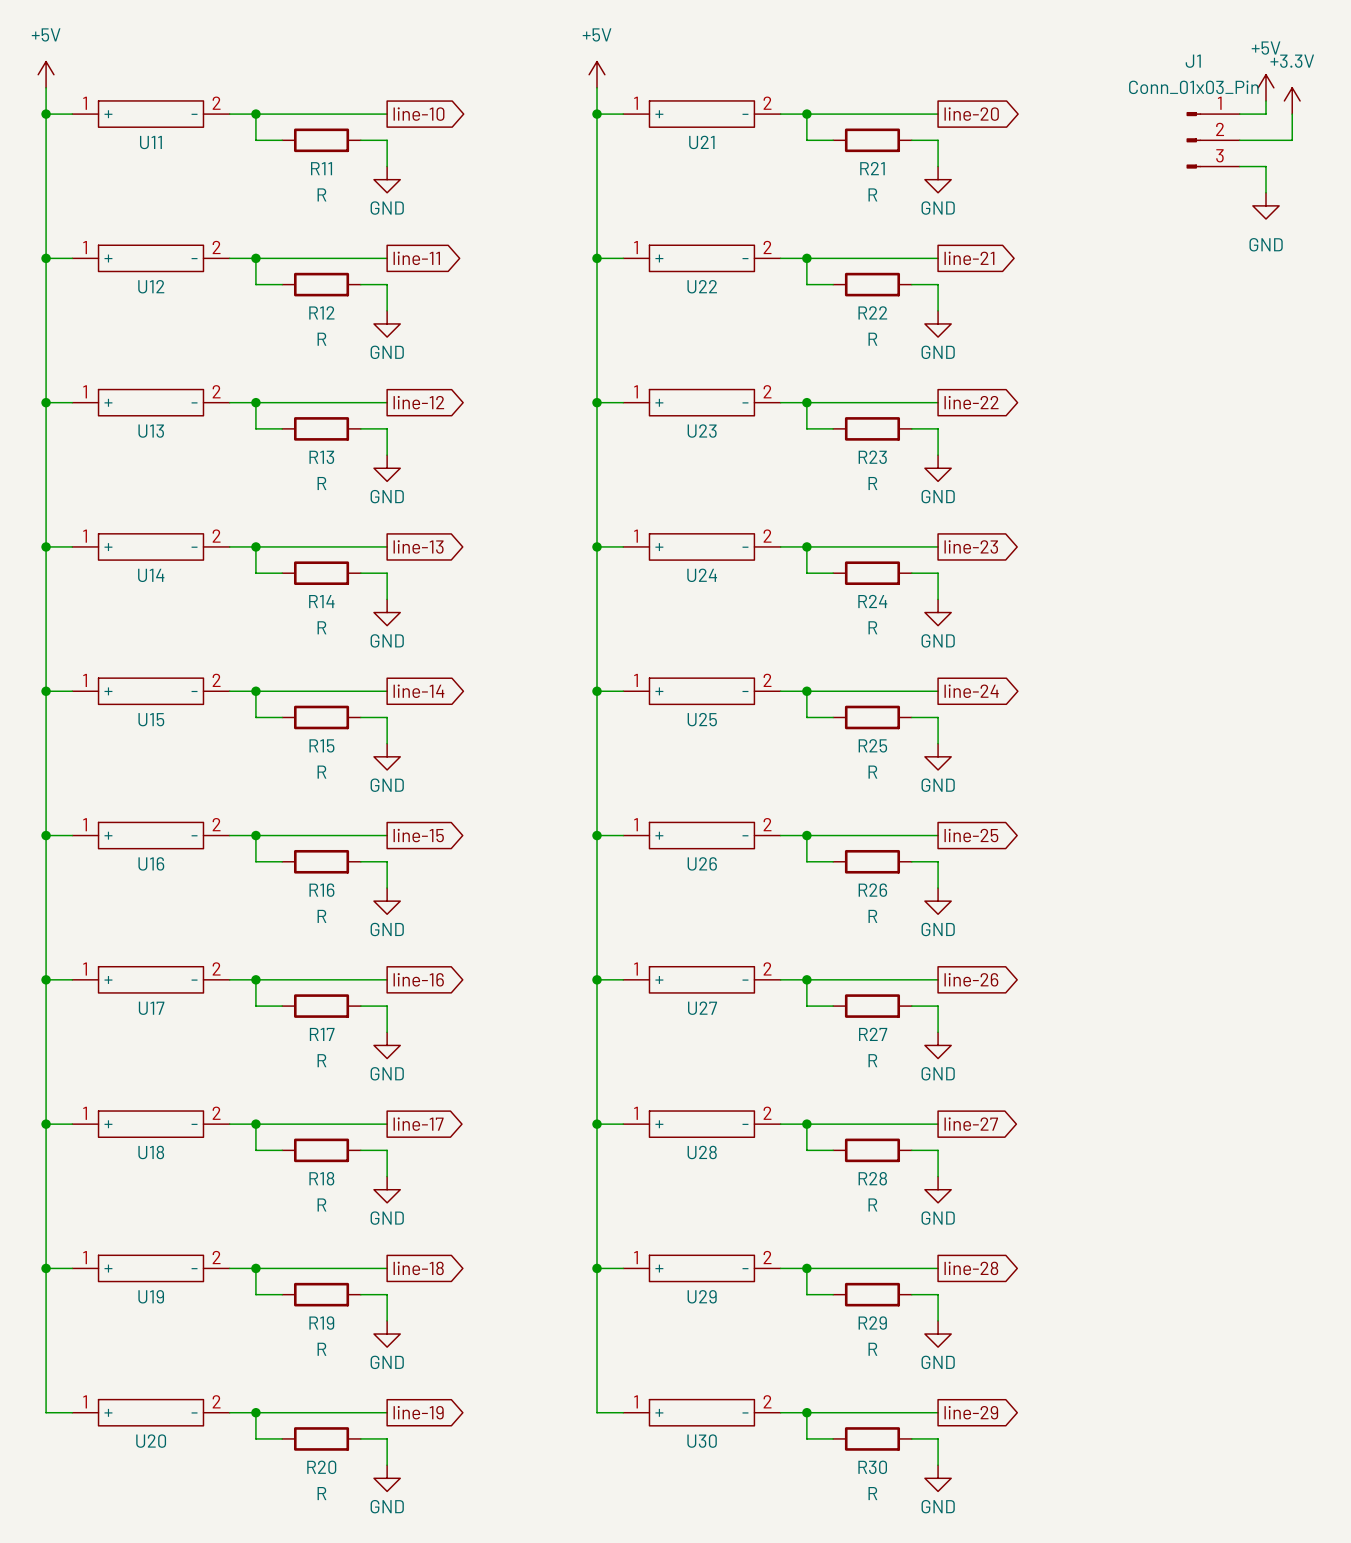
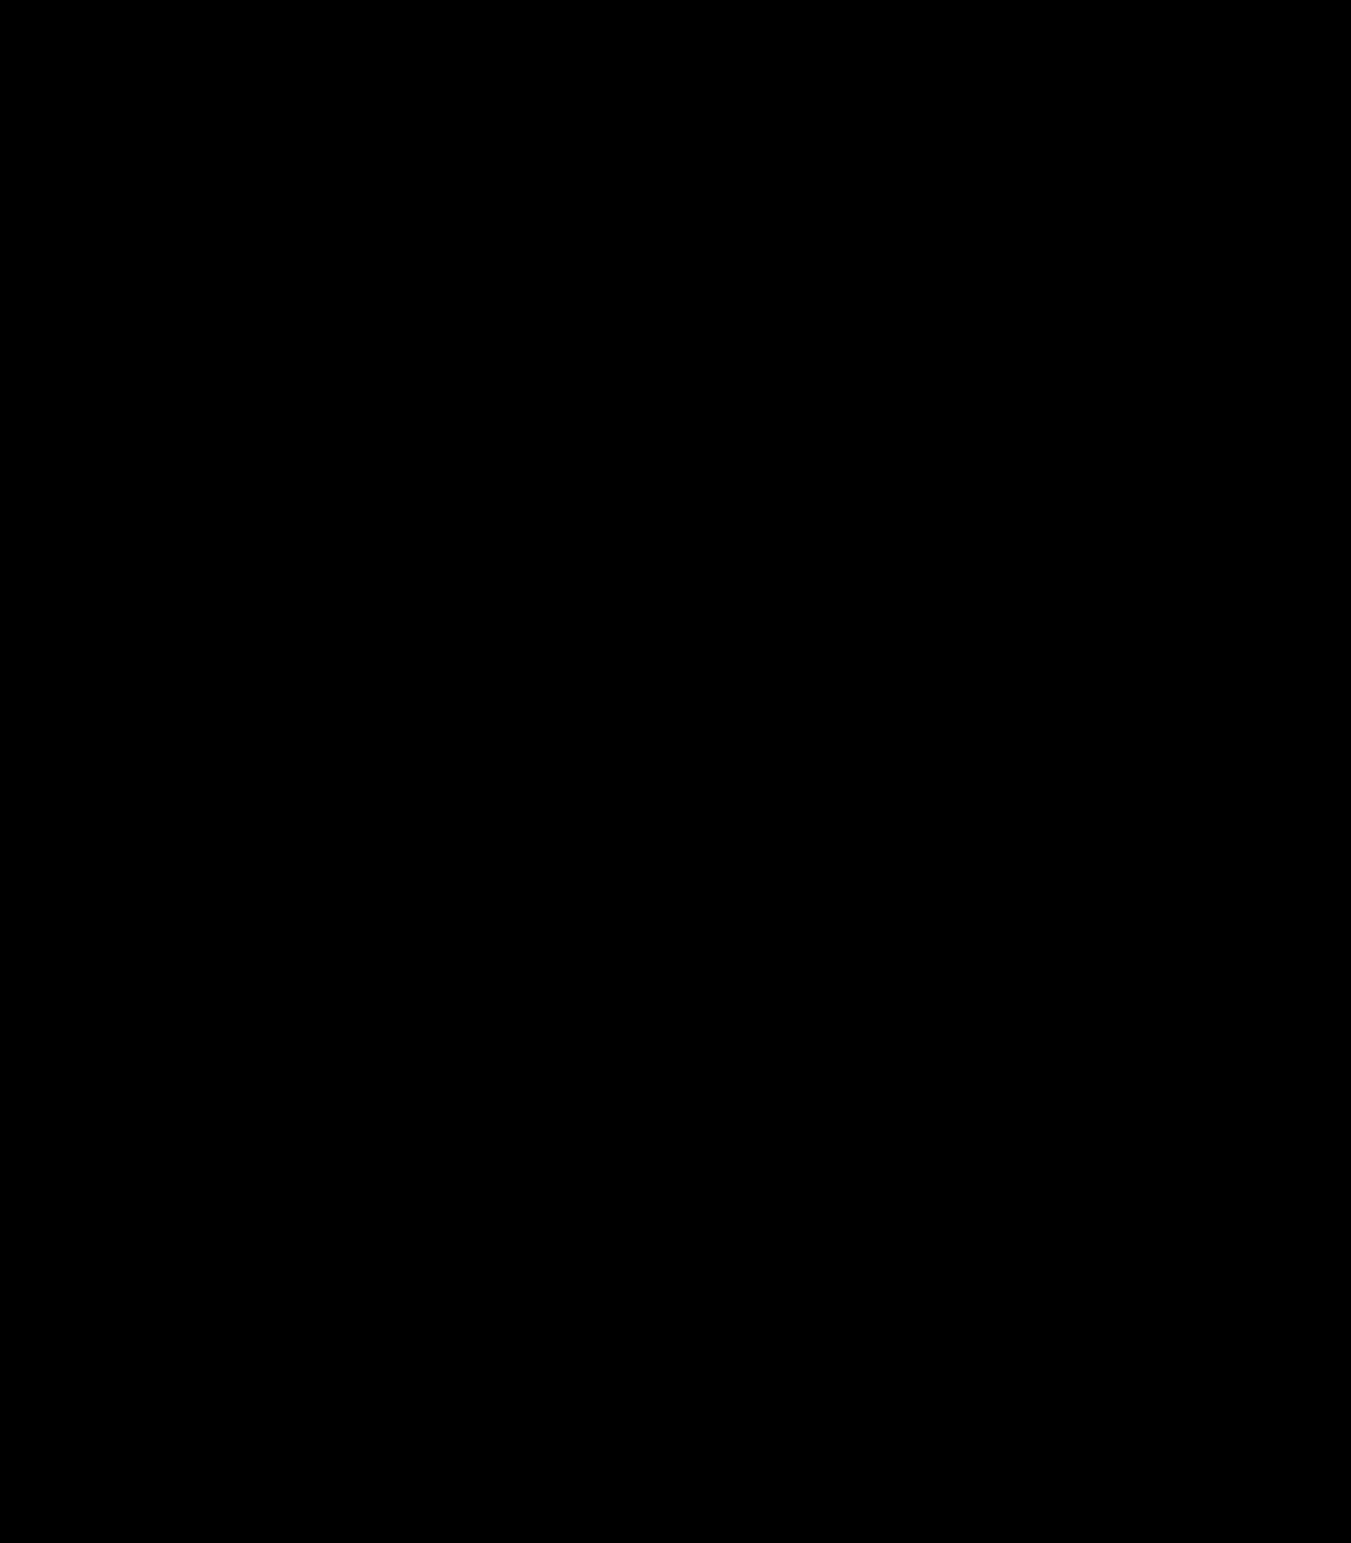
power symbol: +5V (46, 74) -> none
power symbol: +5V (597, 74) -> none
wire: (46, 87) (46, 1412) (72, 1412) -> none
wire: (597, 87) (597, 1412) (623, 1412) -> none
power symbol: +5V (1266, 87) -> none
wire: (1266, 100) (1266, 114) (1239, 114) -> none
power symbol: +3.3V (1292, 100) -> none
wire: (46, 114) (72, 114) -> none
junction: (46, 114) -> none
U11: (151, 114) -> none
wire: (229, 114) (387, 114) -> none
wire: (255, 114) (255, 140) (282, 140) -> none
junction: (255, 114) -> none
global label: line-10 (418, 114) -> none
wire: (597, 114) (623, 114) -> none
junction: (597, 114) -> none
U21: (701, 114) -> none
wire: (780, 114) (938, 114) -> none
wire: (806, 114) (806, 140) (833, 140) -> none
junction: (806, 114) -> none
global label: line-20 (971, 114) -> none
wire: (1292, 114) (1292, 140) (1239, 140) -> none
R11: R (321, 140) -> none
wire: (360, 140) (387, 140) (387, 166) -> none
R21: R (872, 140) -> none
wire: (911, 140) (938, 140) (938, 166) -> none
J1: Conn_01x03_Pin (1213, 140) -> none
wire: (1239, 166) (1266, 166) (1266, 192) -> none
power symbol: GND (387, 179) -> none
power symbol: GND (938, 179) -> none
power symbol: GND (1266, 205) -> none
wire: (46, 258) (72, 258) -> none
junction: (46, 258) -> none
U12: (151, 258) -> none
wire: (229, 258) (387, 258) -> none
wire: (255, 258) (255, 284) (282, 284) -> none
junction: (255, 258) -> none
global label: line-11 (416, 258) -> none
wire: (597, 258) (623, 258) -> none
junction: (597, 258) -> none
U22: (701, 258) -> none
wire: (780, 258) (938, 258) -> none
wire: (806, 258) (806, 284) (833, 284) -> none
junction: (806, 258) -> none
global label: line-21 (969, 258) -> none
R12: R (321, 284) -> none
wire: (360, 284) (387, 284) (387, 310) -> none
R22: R (872, 284) -> none
wire: (911, 284) (938, 284) (938, 310) -> none
power symbol: GND (387, 323) -> none
power symbol: GND (938, 323) -> none
wire: (46, 402) (72, 402) -> none
junction: (46, 402) -> none
U13: (151, 402) -> none
wire: (229, 402) (387, 402) -> none
wire: (255, 402) (255, 428) (282, 428) -> none
junction: (255, 402) -> none
global label: line-12 (418, 402) -> none
wire: (597, 402) (623, 402) -> none
junction: (597, 402) -> none
U23: (701, 402) -> none
wire: (780, 402) (938, 402) -> none
wire: (806, 402) (806, 428) (833, 428) -> none
junction: (806, 402) -> none
global label: line-22 (971, 402) -> none
R13: R (321, 428) -> none
wire: (360, 428) (387, 428) (387, 455) -> none
R23: R (872, 428) -> none
wire: (911, 428) (938, 428) (938, 455) -> none
power symbol: GND (387, 468) -> none
power symbol: GND (938, 468) -> none
wire: (46, 546) (72, 546) -> none
junction: (46, 546) -> none
U14: (151, 546) -> none
wire: (229, 546) (387, 546) -> none
wire: (255, 546) (255, 573) (282, 573) -> none
junction: (255, 546) -> none
global label: line-13 (418, 546) -> none
wire: (597, 546) (623, 546) -> none
junction: (597, 546) -> none
U24: (701, 546) -> none
wire: (780, 546) (938, 546) -> none
wire: (806, 546) (806, 573) (833, 573) -> none
junction: (806, 546) -> none
global label: line-23 (971, 546) -> none
R14: R (321, 573) -> none
wire: (360, 573) (387, 573) (387, 599) -> none
R24: R (872, 573) -> none
wire: (911, 573) (938, 573) (938, 599) -> none
power symbol: GND (387, 612) -> none
power symbol: GND (938, 612) -> none
wire: (46, 691) (72, 691) -> none
junction: (46, 691) -> none
U15: (151, 691) -> none
wire: (229, 691) (387, 691) -> none
wire: (255, 691) (255, 717) (282, 717) -> none
junction: (255, 691) -> none
global label: line-14 (418, 691) -> none
wire: (597, 691) (623, 691) -> none
junction: (597, 691) -> none
U25: (701, 691) -> none
wire: (780, 691) (938, 691) -> none
wire: (806, 691) (806, 717) (833, 717) -> none
junction: (806, 691) -> none
global label: line-24 (971, 691) -> none
R15: R (321, 717) -> none
wire: (360, 717) (387, 717) (387, 743) -> none
R25: R (872, 717) -> none
wire: (911, 717) (938, 717) (938, 743) -> none
power symbol: GND (387, 756) -> none
power symbol: GND (938, 756) -> none
wire: (46, 835) (72, 835) -> none
junction: (46, 835) -> none
U16: (151, 835) -> none
wire: (229, 835) (387, 835) -> none
wire: (255, 835) (255, 861) (282, 861) -> none
junction: (255, 835) -> none
global label: line-15 (418, 835) -> none
wire: (597, 835) (623, 835) -> none
junction: (597, 835) -> none
U26: (701, 835) -> none
wire: (780, 835) (938, 835) -> none
wire: (806, 835) (806, 861) (833, 861) -> none
junction: (806, 835) -> none
global label: line-25 (971, 835) -> none
R16: R (321, 861) -> none
wire: (360, 861) (387, 861) (387, 888) -> none
R26: R (872, 861) -> none
wire: (911, 861) (938, 861) (938, 888) -> none
power symbol: GND (387, 901) -> none
power symbol: GND (938, 901) -> none
wire: (46, 979) (72, 979) -> none
junction: (46, 979) -> none
U17: (151, 979) -> none
wire: (229, 979) (387, 979) -> none
wire: (255, 979) (255, 1006) (282, 1006) -> none
junction: (255, 979) -> none
global label: line-16 (418, 979) -> none
wire: (597, 979) (623, 979) -> none
junction: (597, 979) -> none
U27: (701, 979) -> none
wire: (780, 979) (938, 979) -> none
wire: (806, 979) (806, 1006) (833, 1006) -> none
junction: (806, 979) -> none
global label: line-26 (971, 979) -> none
R17: R (321, 1006) -> none
wire: (360, 1006) (387, 1006) (387, 1032) -> none
R27: R (872, 1006) -> none
wire: (911, 1006) (938, 1006) (938, 1032) -> none
power symbol: GND (387, 1045) -> none
power symbol: GND (938, 1045) -> none
wire: (46, 1124) (72, 1124) -> none
junction: (46, 1124) -> none
U18: (151, 1124) -> none
wire: (229, 1124) (387, 1124) -> none
wire: (255, 1124) (255, 1150) (282, 1150) -> none
junction: (255, 1124) -> none
global label: line-17 (418, 1124) -> none
wire: (597, 1124) (623, 1124) -> none
junction: (597, 1124) -> none
U28: (701, 1124) -> none
wire: (780, 1124) (938, 1124) -> none
wire: (806, 1124) (806, 1150) (833, 1150) -> none
junction: (806, 1124) -> none
global label: line-27 (971, 1124) -> none
R18: R (321, 1150) -> none
wire: (360, 1150) (387, 1150) (387, 1176) -> none
R28: R (872, 1150) -> none
wire: (911, 1150) (938, 1150) (938, 1176) -> none
power symbol: GND (387, 1189) -> none
power symbol: GND (938, 1189) -> none
wire: (46, 1268) (72, 1268) -> none
junction: (46, 1268) -> none
U19: (151, 1268) -> none
wire: (229, 1268) (387, 1268) -> none
wire: (255, 1268) (255, 1294) (282, 1294) -> none
junction: (255, 1268) -> none
global label: line-18 (418, 1268) -> none
wire: (597, 1268) (623, 1268) -> none
junction: (597, 1268) -> none
U29: (701, 1268) -> none
wire: (780, 1268) (938, 1268) -> none
wire: (806, 1268) (806, 1294) (833, 1294) -> none
junction: (806, 1268) -> none
global label: line-28 (971, 1268) -> none
R19: R (321, 1294) -> none
wire: (360, 1294) (387, 1294) (387, 1320) -> none
R29: R (872, 1294) -> none
wire: (911, 1294) (938, 1294) (938, 1320) -> none
power symbol: GND (387, 1334) -> none
power symbol: GND (938, 1334) -> none
U20: (151, 1412) -> none
wire: (229, 1412) (387, 1412) -> none
wire: (255, 1412) (255, 1438) (282, 1438) -> none
junction: (255, 1412) -> none
global label: line-19 (418, 1412) -> none
U30: (701, 1412) -> none
wire: (780, 1412) (938, 1412) -> none
wire: (806, 1412) (806, 1438) (833, 1438) -> none
junction: (806, 1412) -> none
global label: line-29 (971, 1412) -> none
R20: R (321, 1438) -> none
wire: (360, 1438) (387, 1438) (387, 1465) -> none
R30: R (872, 1438) -> none
wire: (911, 1438) (938, 1438) (938, 1465) -> none
power symbol: GND (387, 1478) -> none
power symbol: GND (938, 1478) -> none

